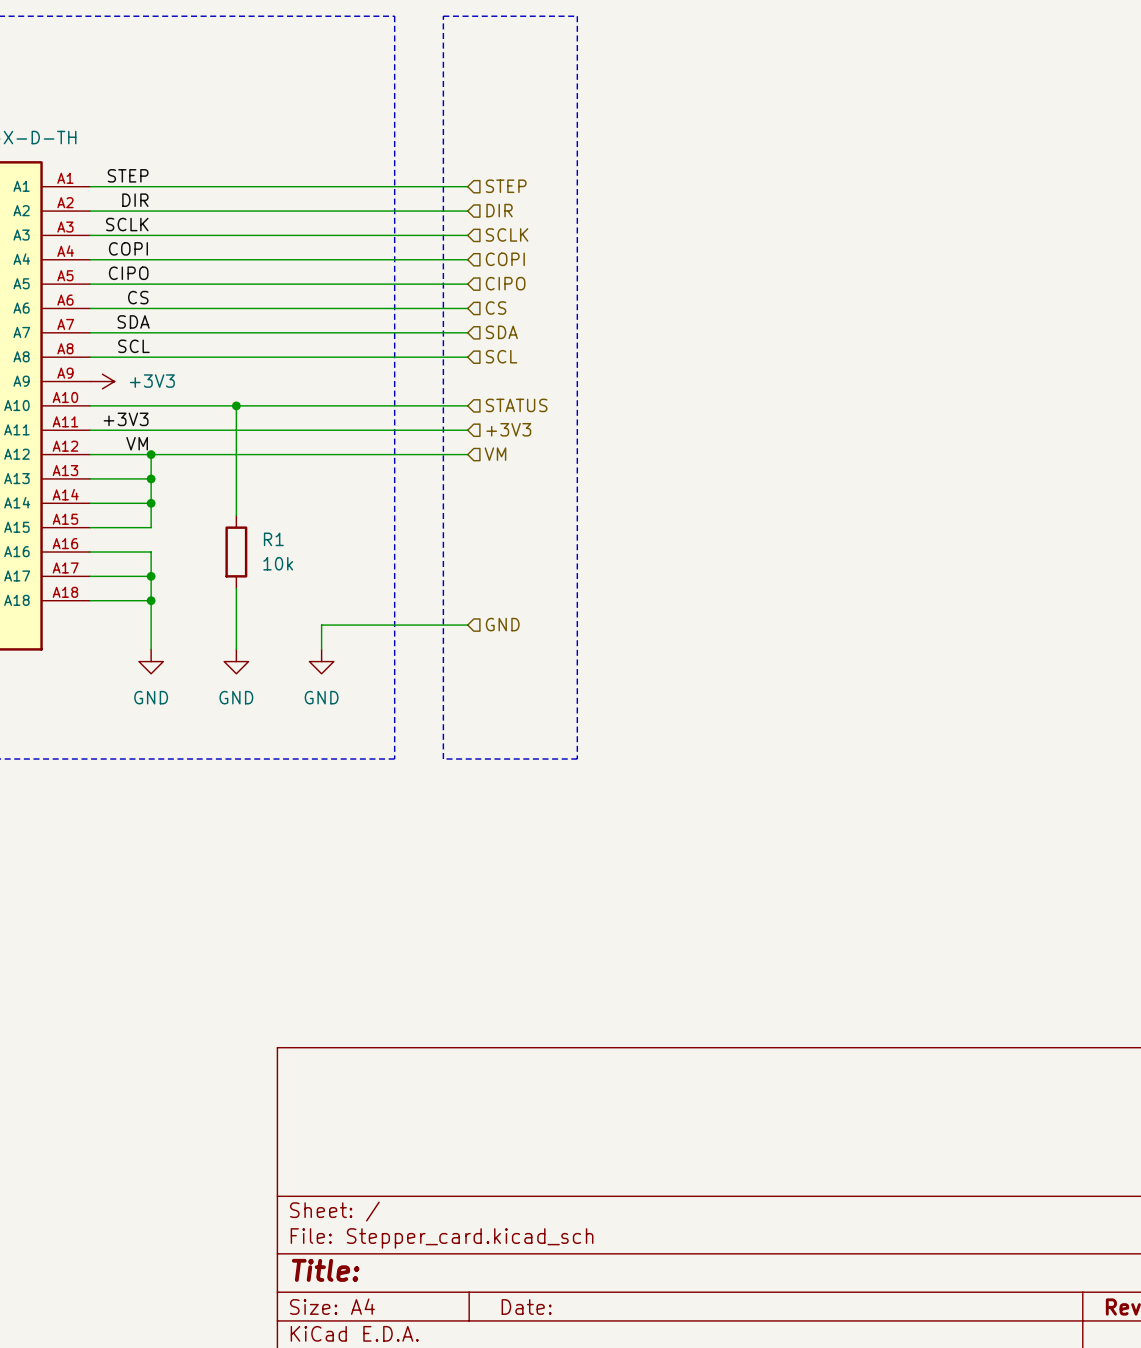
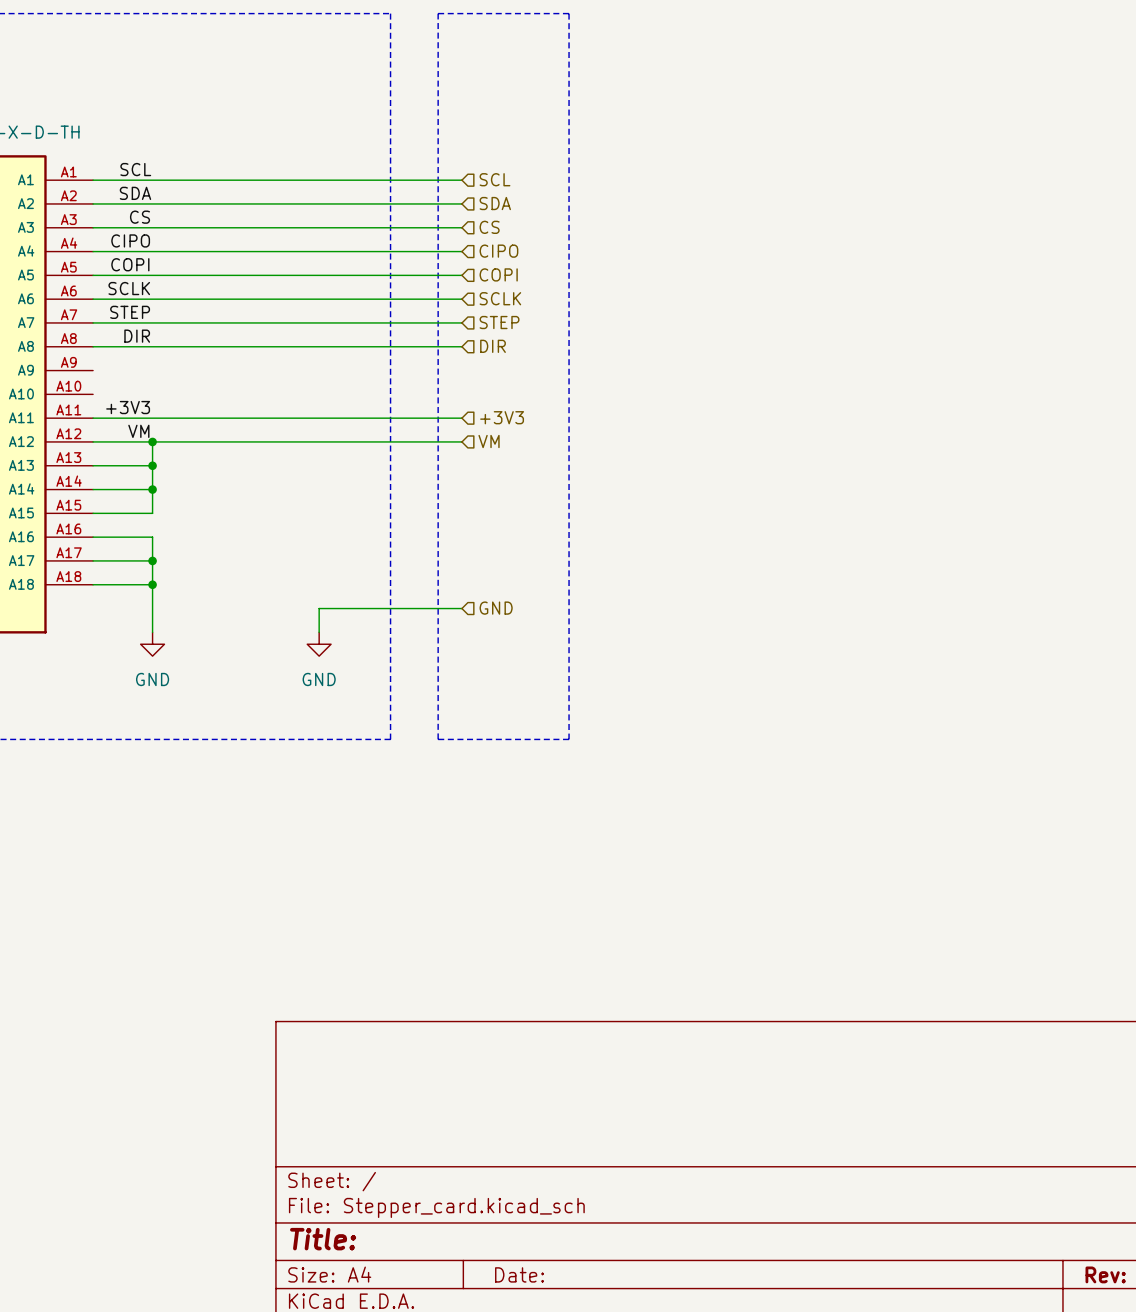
label: STEP (128, 175) -> SCL (135, 169)
hierarchical label: STEP (506, 186) -> SCL (494, 179)
label: DIR (135, 200) -> SDA (135, 193)
hierarchical label: DIR (499, 210) -> SDA (495, 203)
label: SCLK (127, 224) -> CS (140, 217)
hierarchical label: SCLK (507, 234) -> CS (489, 227)
label: COPI (128, 248) -> CIPO (130, 240)
hierarchical label: COPI (505, 259) -> CIPO (498, 251)
label: CIPO (128, 273) -> COPI (130, 264)
hierarchical label: CIPO (505, 283) -> COPI (498, 274)
label: CS (138, 297) -> SCLK (129, 288)
hierarchical label: CS (496, 308) -> SCLK (500, 298)
label: SDA (133, 321) -> STEP (130, 312)
hierarchical label: SDA (501, 332) -> STEP (499, 322)
label: SCL (133, 346) -> DIR (137, 336)
hierarchical label: SCL (501, 356) -> DIR (493, 346)
power symbol: +3V3 (102, 381) -> none
wire: (90, 405) (467, 405) -> none
wire: (236, 405) (236, 515) -> none
junction: (236, 405) -> none
hierarchical label: STATUS (516, 405) -> none
R1: 10k (236, 552) -> none
wire: (236, 588) (236, 649) -> none
power symbol: GND (236, 661) -> none

